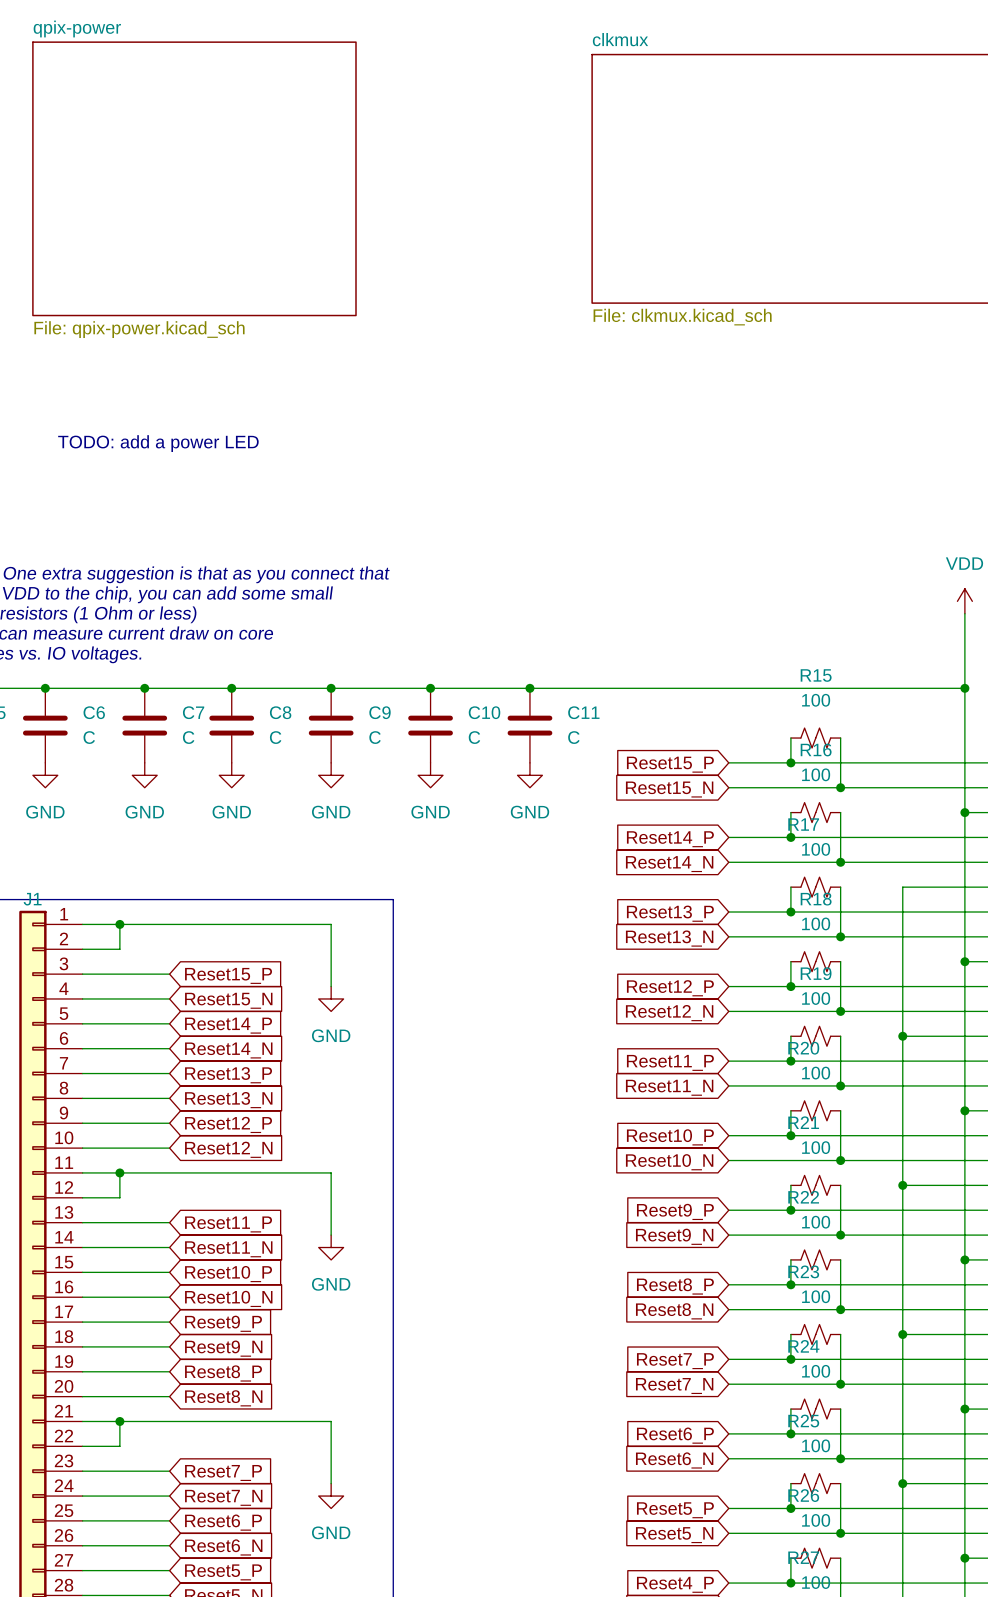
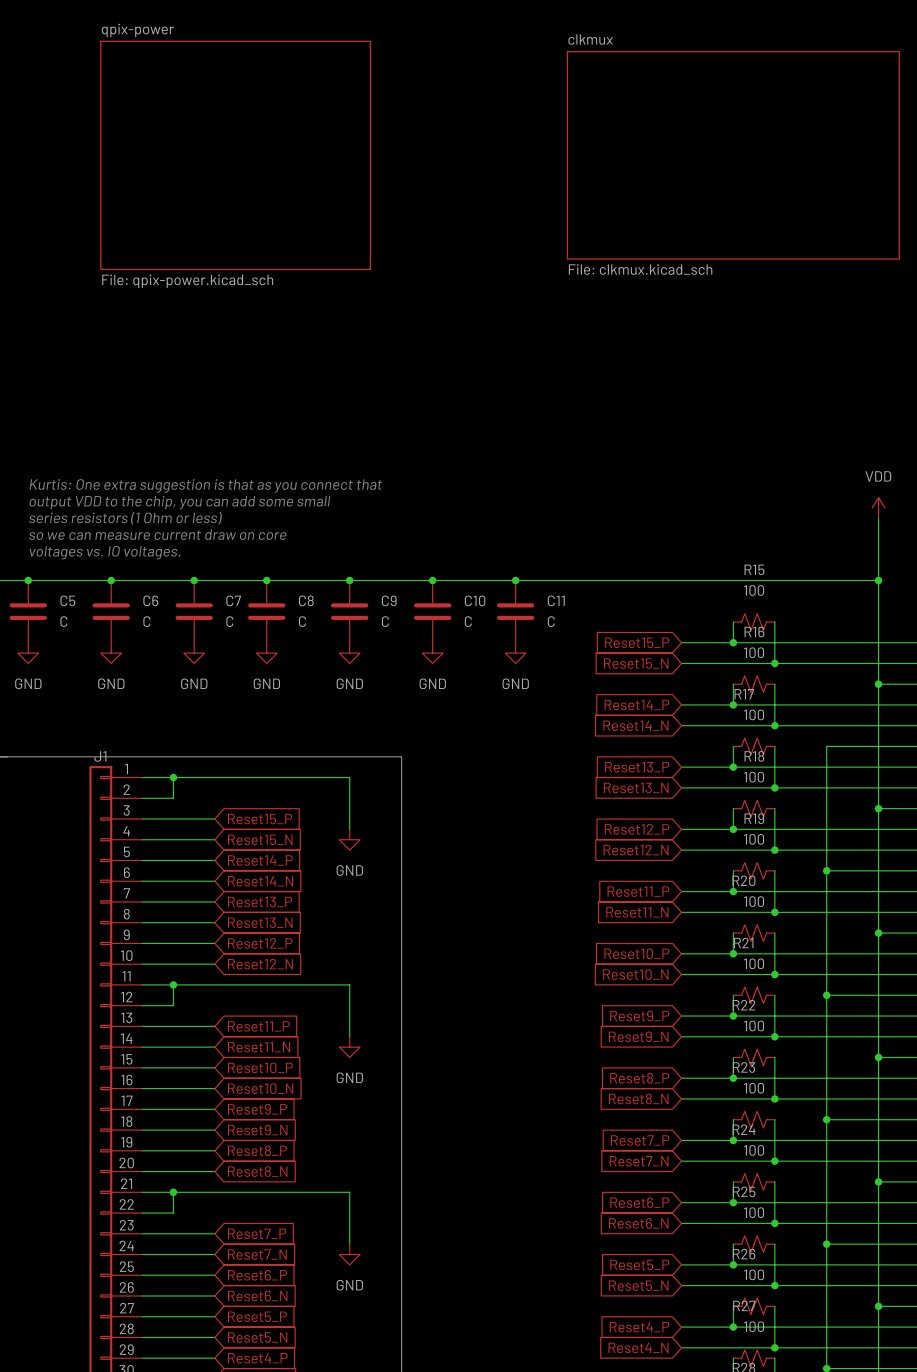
text: TODO: add a power LED (158, 443) -> none

